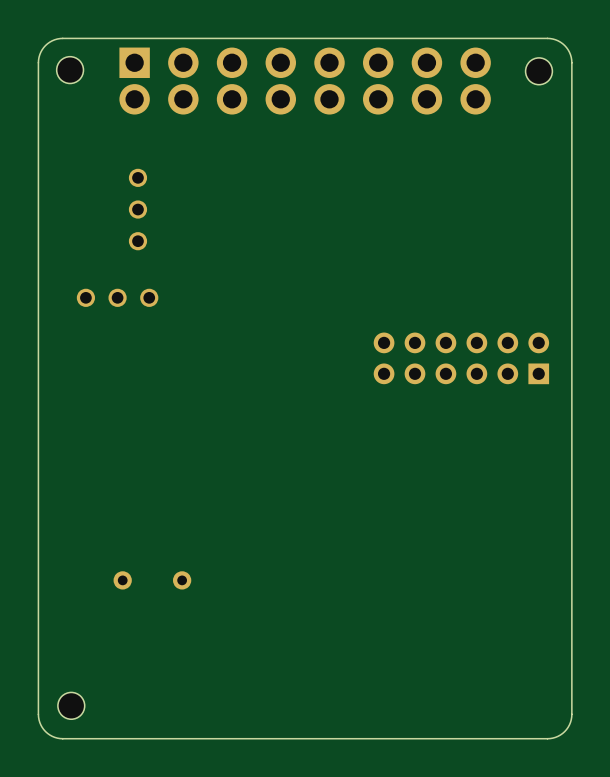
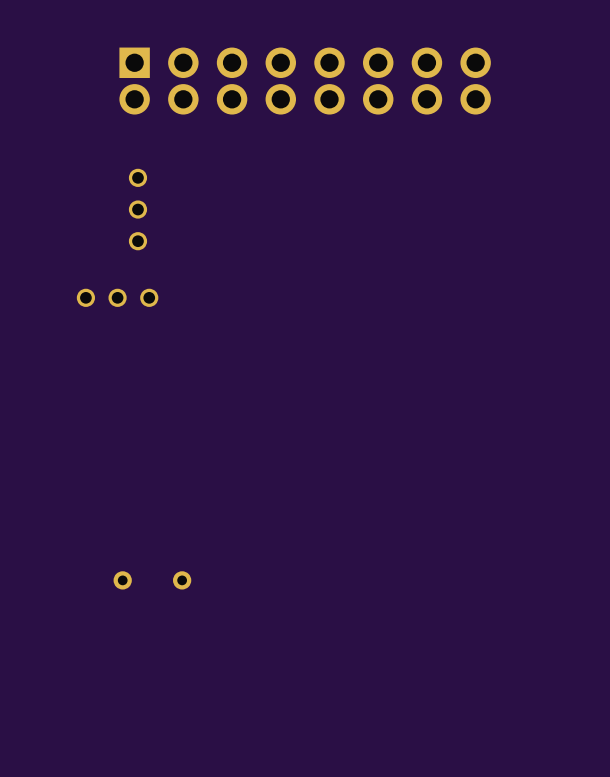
board edge: (547, 38) (62, 38) (52, 40) (43, 47) (38, 62) (38, 714) (40, 724) (47, 733) (62, 738) (547, 738) (558, 736) (566, 729) (571, 714) (571, 62) (569, 52) (564, 45) (555, 39) (547, 38) -> none
part: (70, 70) -> none
part: (538, 71) -> none
part: (461, 358) -> none
part: (71, 705) -> none

